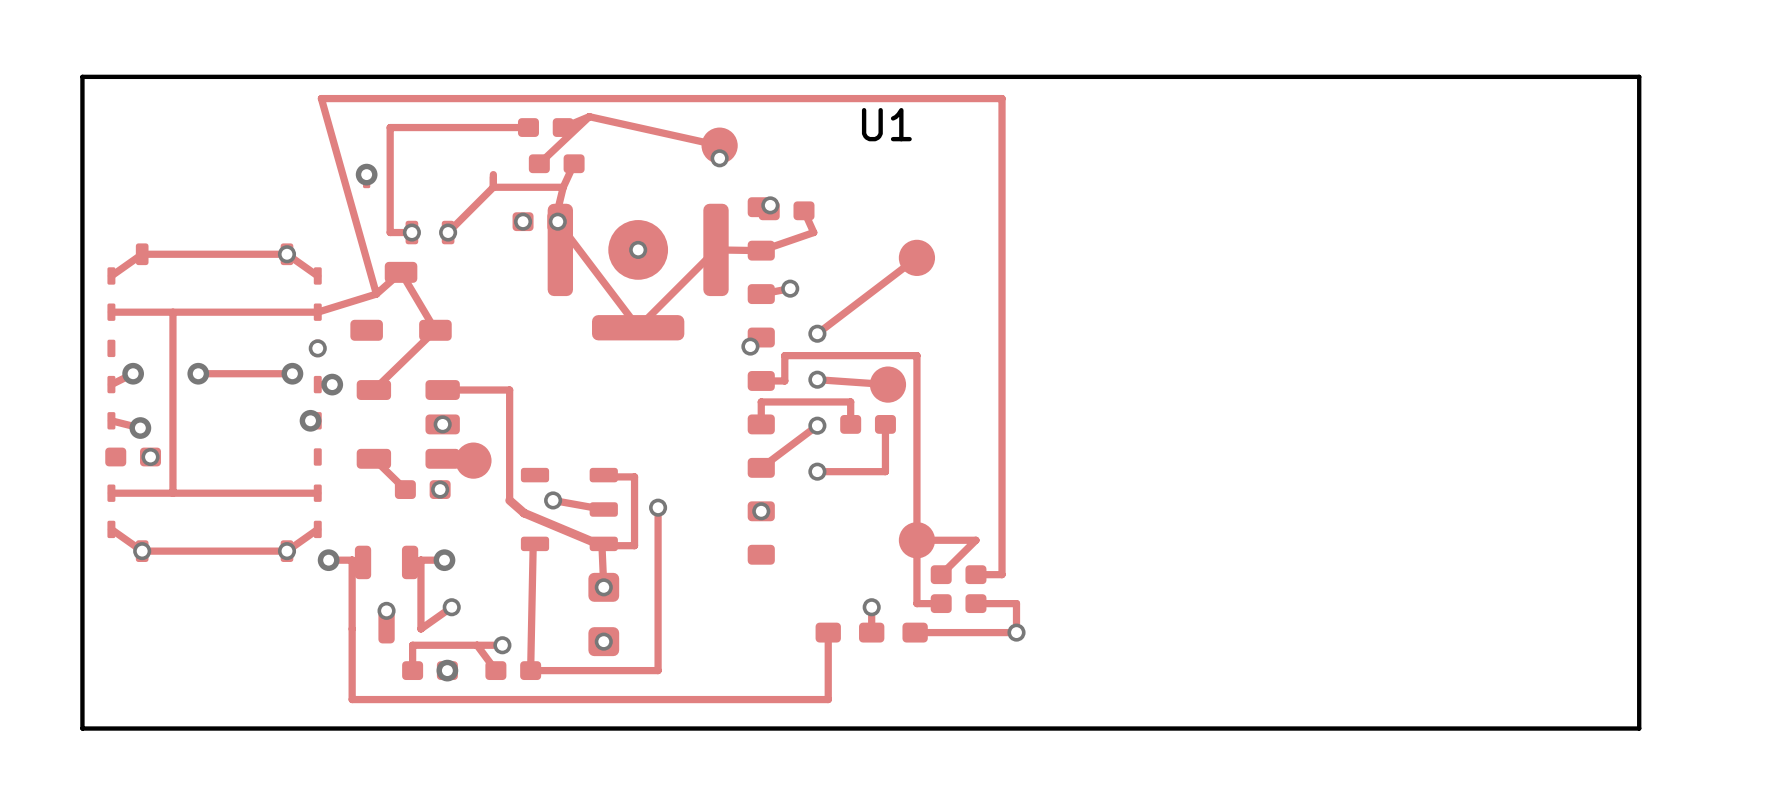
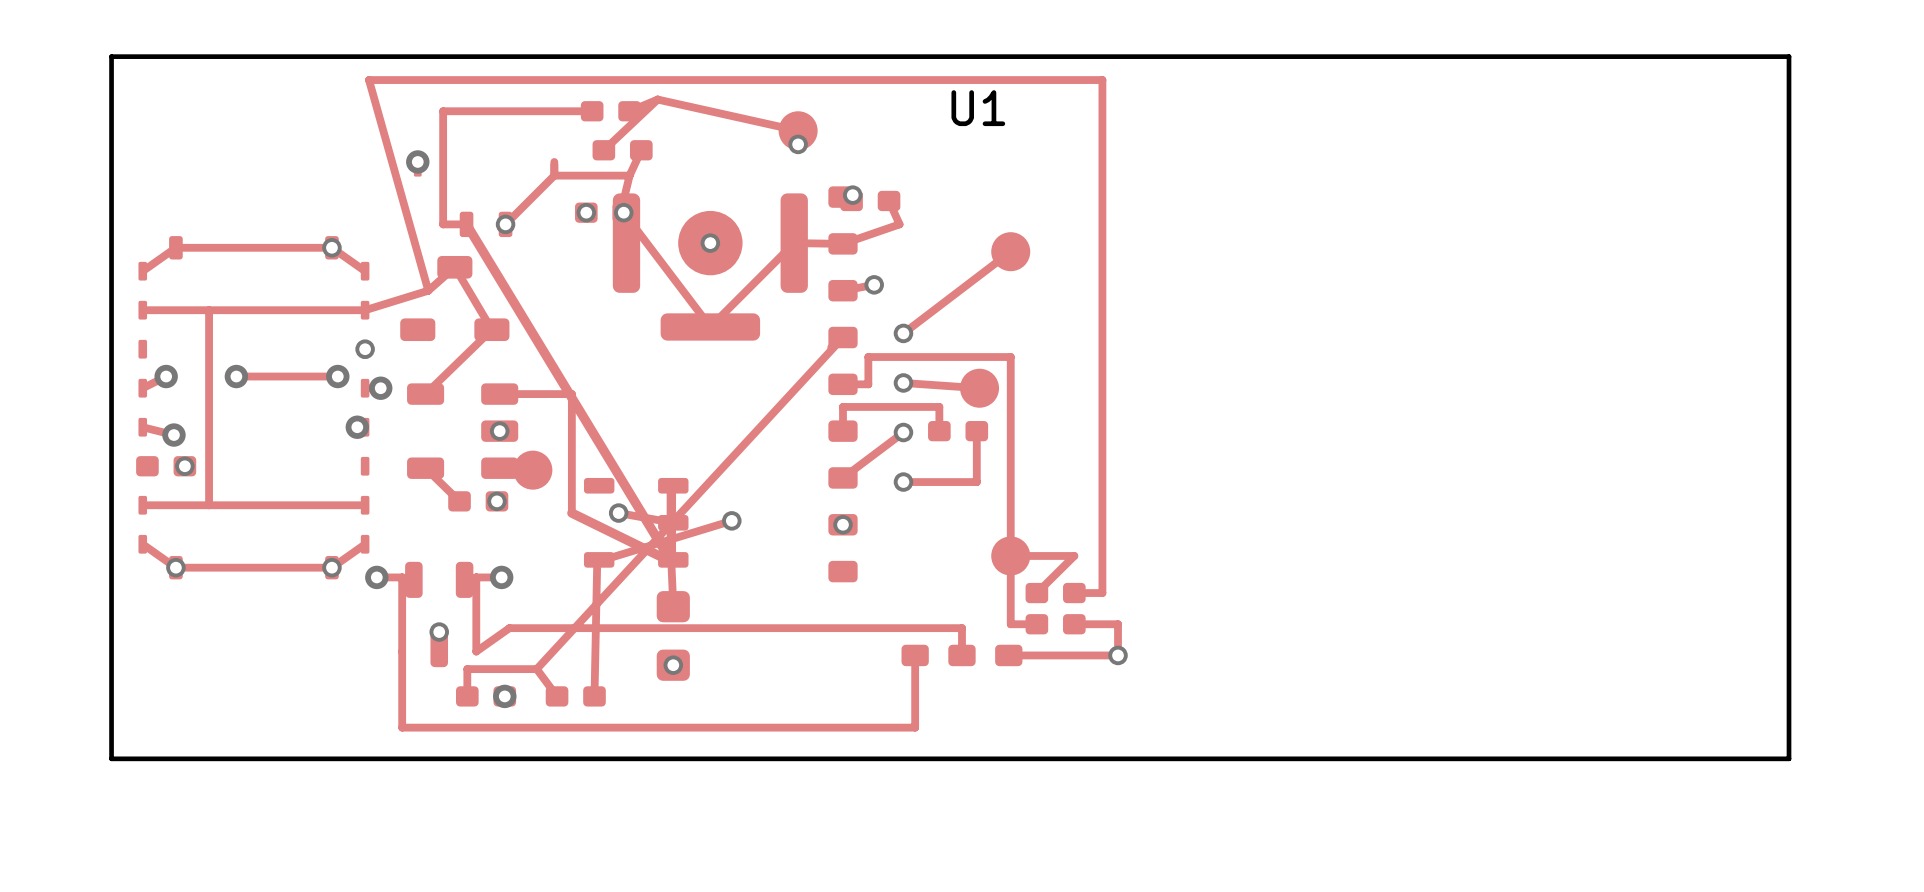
track: none -> (466, 224) (671, 561)
via: (411, 232) -> none
via: (750, 346) -> none
track: (601, 476) (634, 476) (634, 545) (601, 545) (524, 513) (509, 500) -> (671, 561) (571, 513)
track: none -> (671, 487) (671, 561)
track: (658, 507) (658, 670) (530, 670) -> (731, 520) (597, 561)
via: (603, 587) -> none
track: none -> (509, 628) (961, 628)
via: (451, 607) -> none
via: (871, 607) -> none
track: (477, 645) (502, 645) -> (536, 669) (842, 337)
via: (502, 645) -> none

